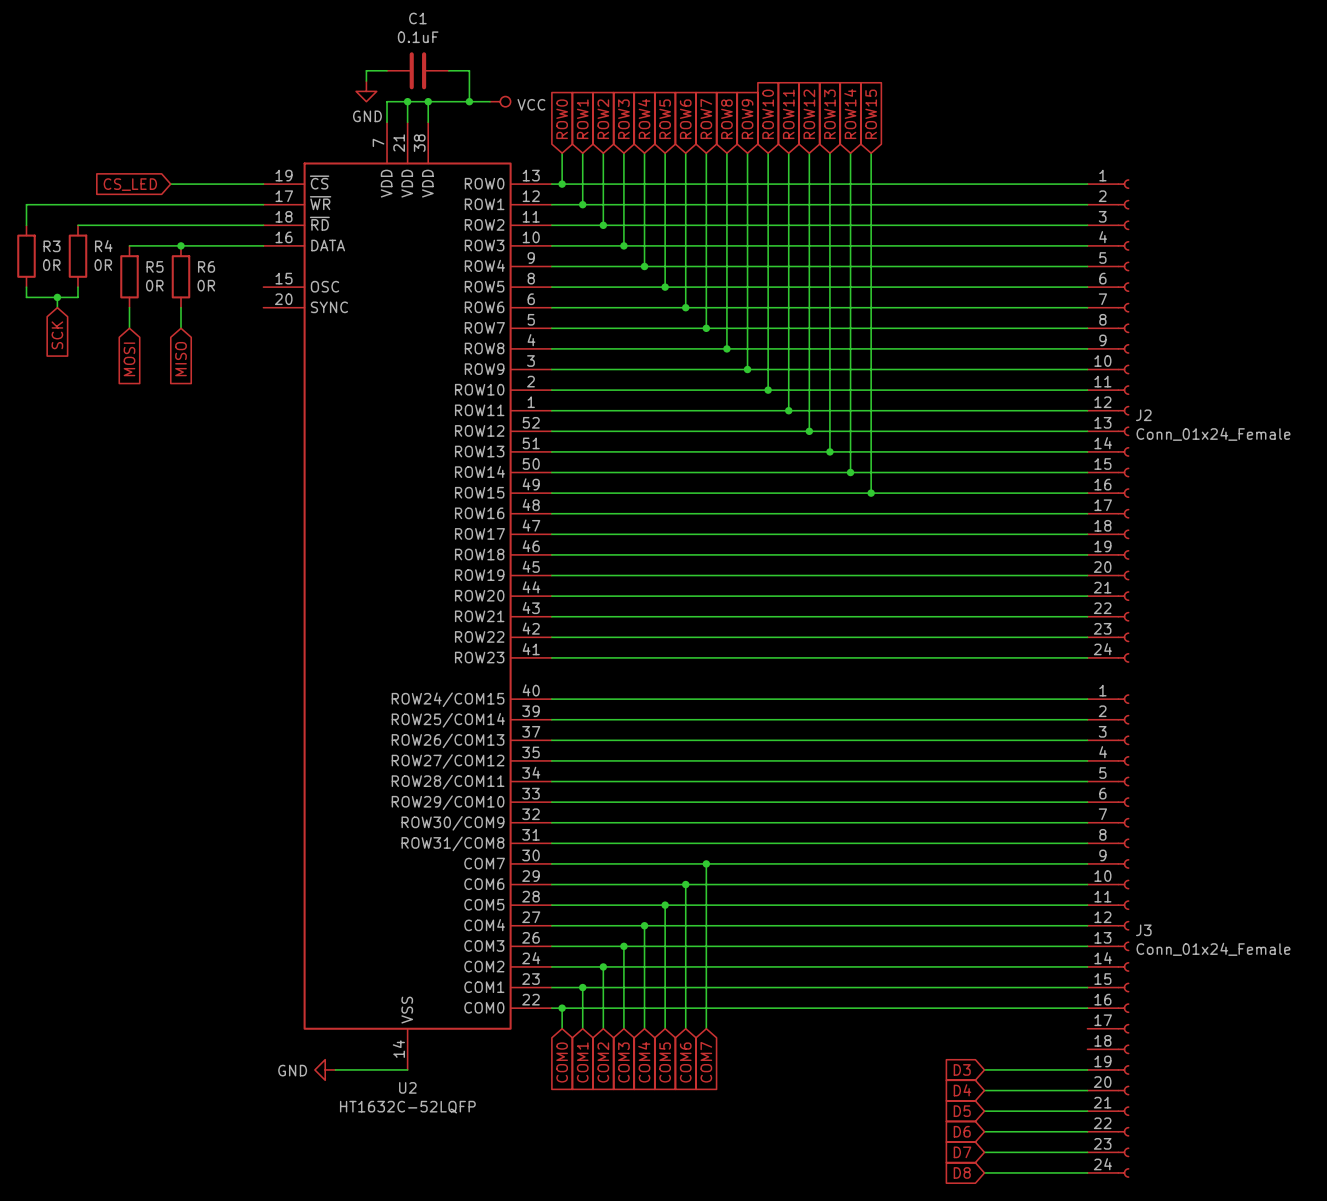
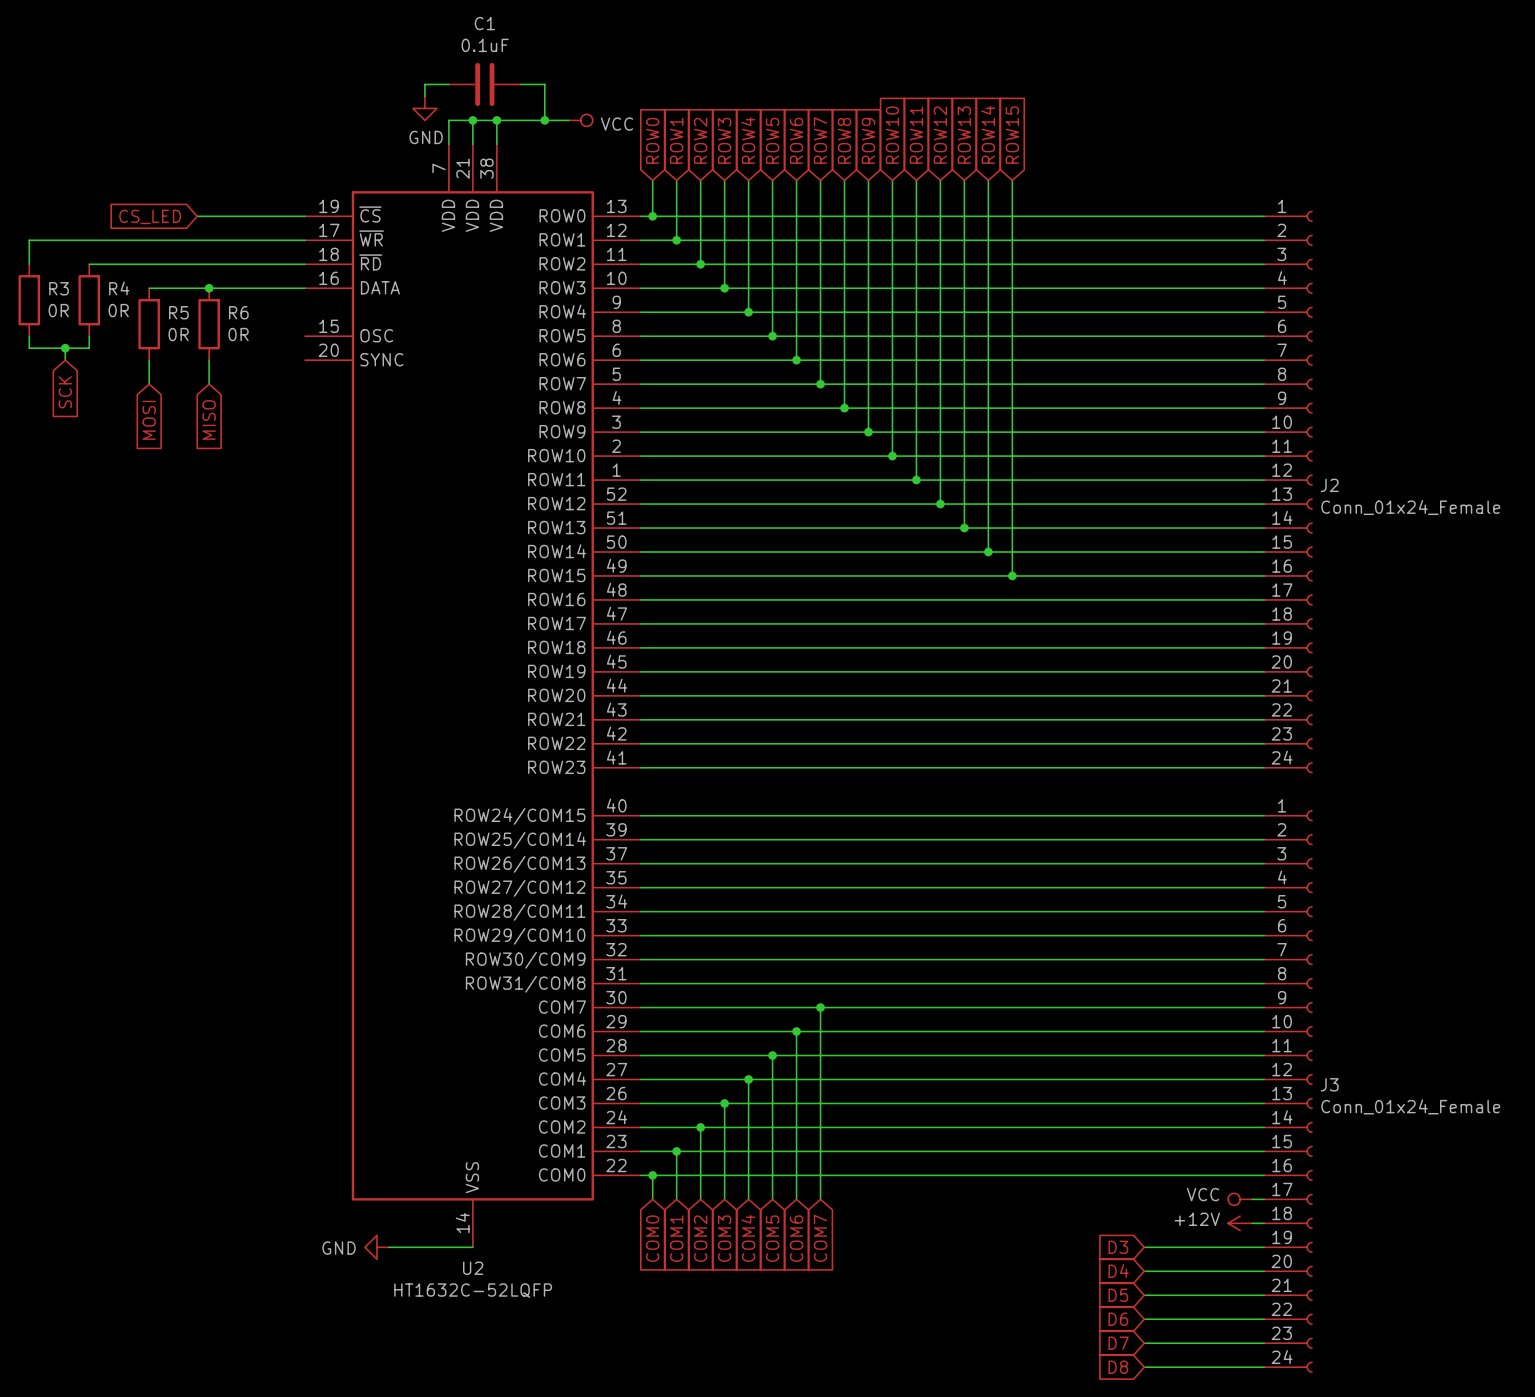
power symbol: none -> VCC (1240, 1199)
wire: none -> (1252, 1199) (1264, 1199)
power symbol: none -> +12V (1240, 1223)
wire: none -> (1252, 1223) (1264, 1223)

